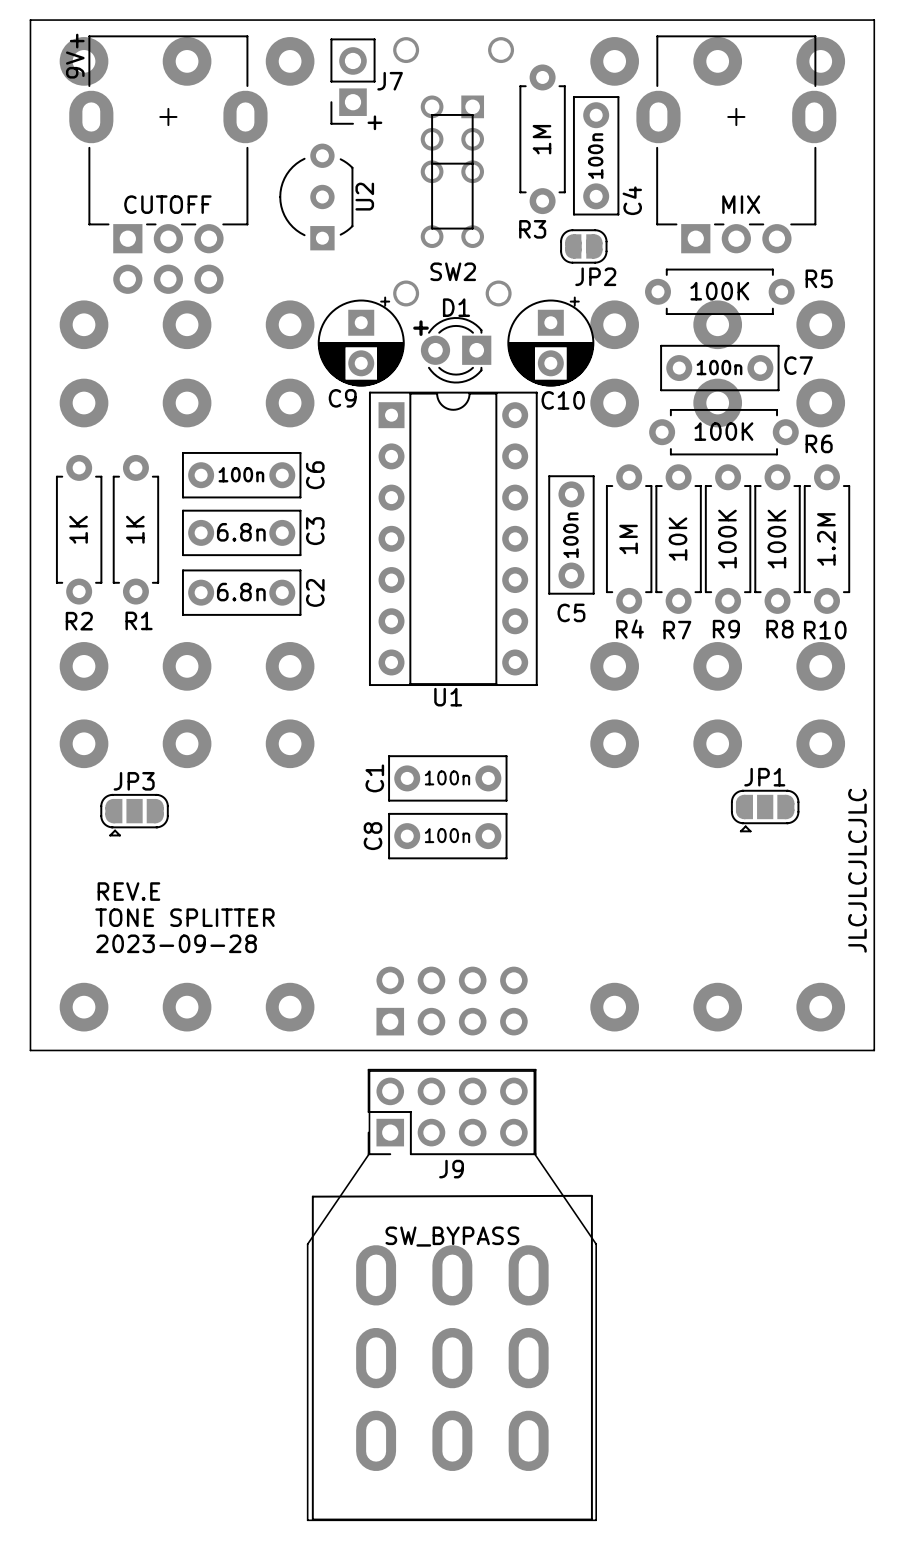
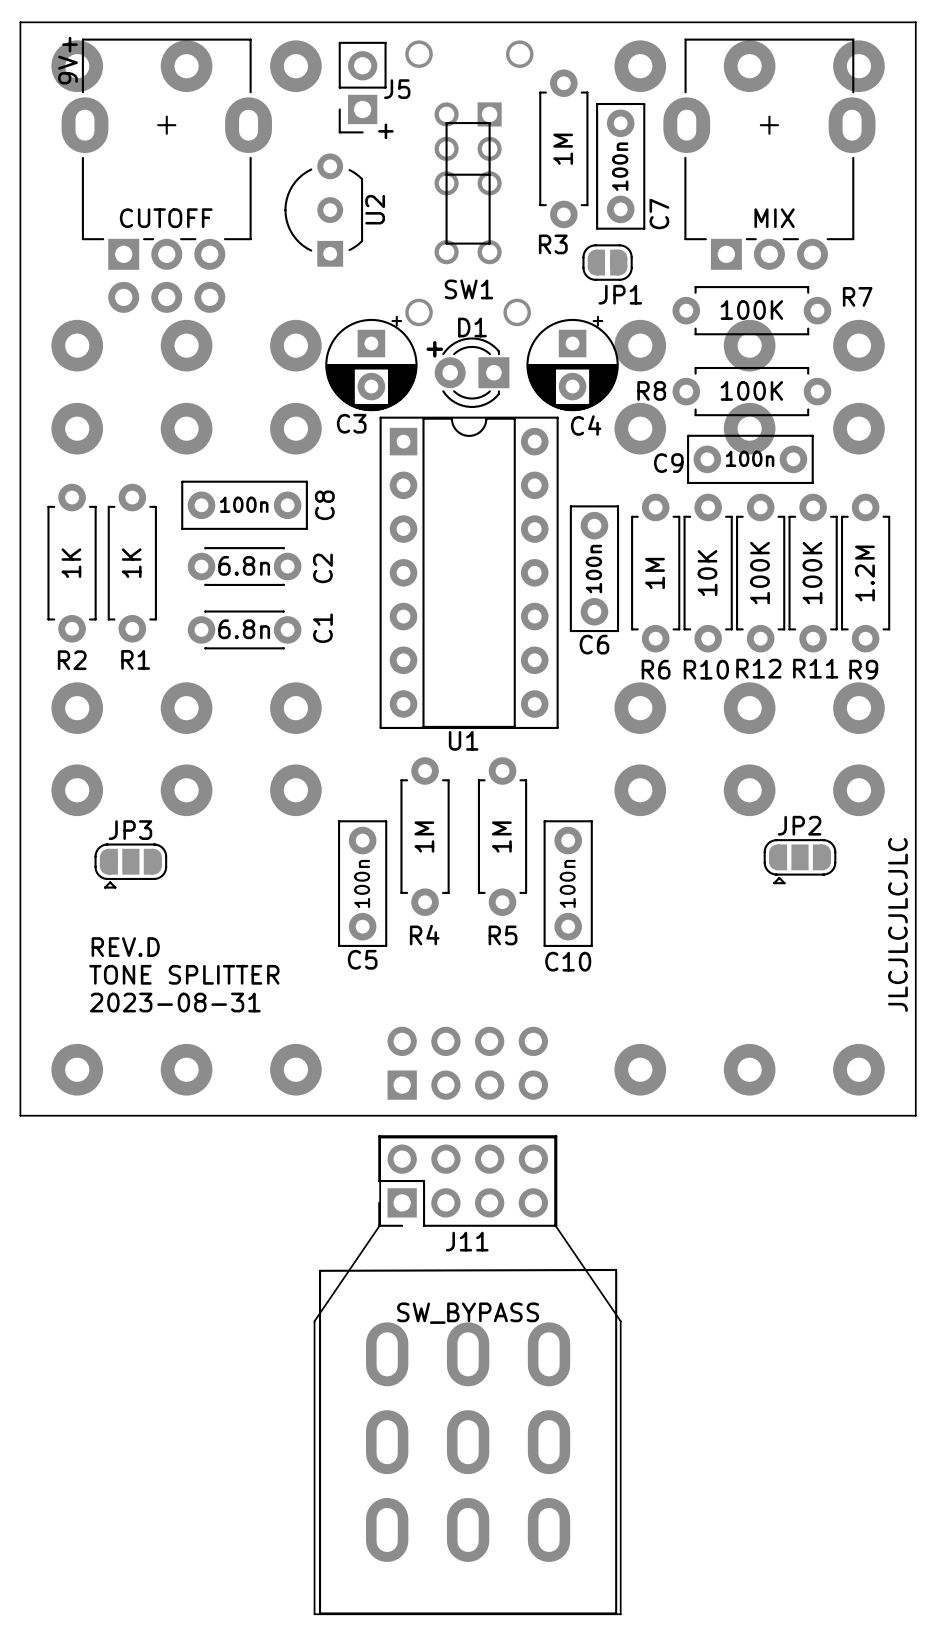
J7 name: J7 (390, 81) -> J5 (397, 89)
C4 name: C4 (632, 200) -> C7 (659, 214)
SW2 name: SW2 (453, 271) -> SW1 (468, 289)
JP2 name: JP2 (595, 276) -> JP1 (620, 294)
R5 name: R5 (819, 278) -> R7 (857, 296)
C7: 100n (719, 368) -> none
R8: none -> 100K (751, 391)
C9 name: C9 (342, 398) -> C3 (351, 423)
C10 name: C10 (563, 400) -> C4 (586, 425)
C9: none -> 100n (750, 459)
R6: 100K (723, 432) -> none
C6 name: C6 (315, 475) -> C8 (324, 505)
C3: 6.8n (241, 532) -> none
C2 footprint: [182, 569, 302, 616] -> [187, 547, 302, 586]
C5 name: C5 (571, 612) -> C6 (594, 644)
R4 name: R4 (629, 629) -> R6 (656, 669)
R9 name: R9 (726, 629) -> R12 (758, 668)
R8 name: R8 (779, 629) -> R11 (815, 668)
R7 name: R7 (677, 630) -> R10 (706, 669)
R10 name: R10 (825, 630) -> R9 (863, 669)
C1 footprint: [388, 755, 508, 802] -> [187, 610, 302, 650]
C1 value: 100n (447, 777) -> 6.8n (244, 629)
JP1 name: JP1 (764, 777) -> JP2 (799, 825)
C1 name position: C1 (374, 778) -> C1 (322, 628)
R4: none -> 1M (425, 836)
R5: none -> 1M (502, 836)
C5: none -> 100n (362, 883)
C10: none -> 100n (568, 883)
C8: 100n (447, 836) -> none
text: REV.E (128, 891) -> REV.D (125, 947)
text: 2023-09-28 (176, 943) -> 2023-08-31 (175, 1002)
J9 name: J9 (451, 1169) -> J11 (467, 1241)

